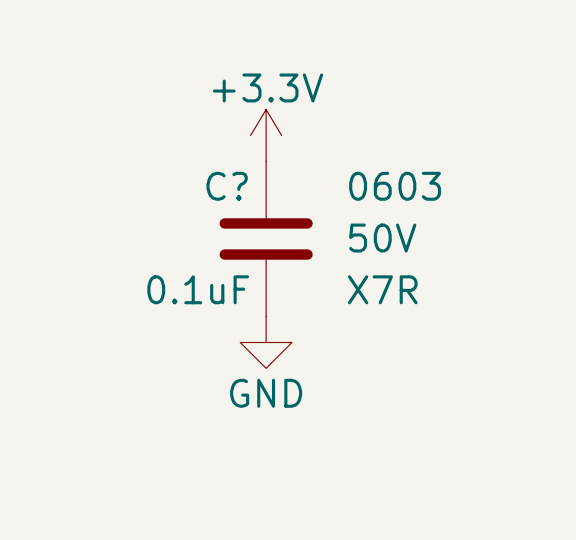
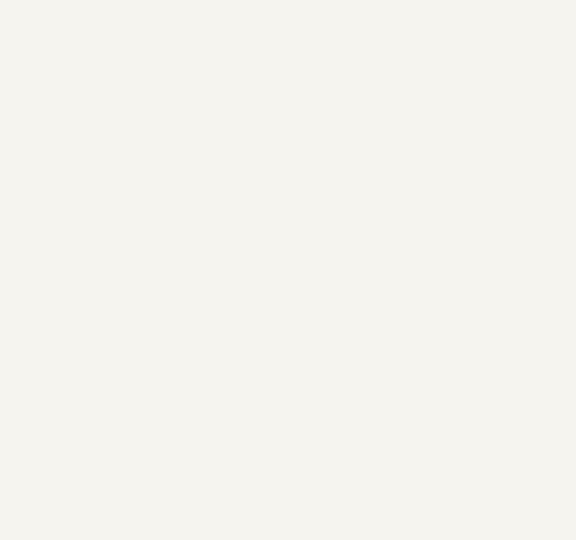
power symbol: +3.3V (266, 135) -> none
C?: 0.1uF (266, 239) -> none
power symbol: GND (266, 342) -> none

